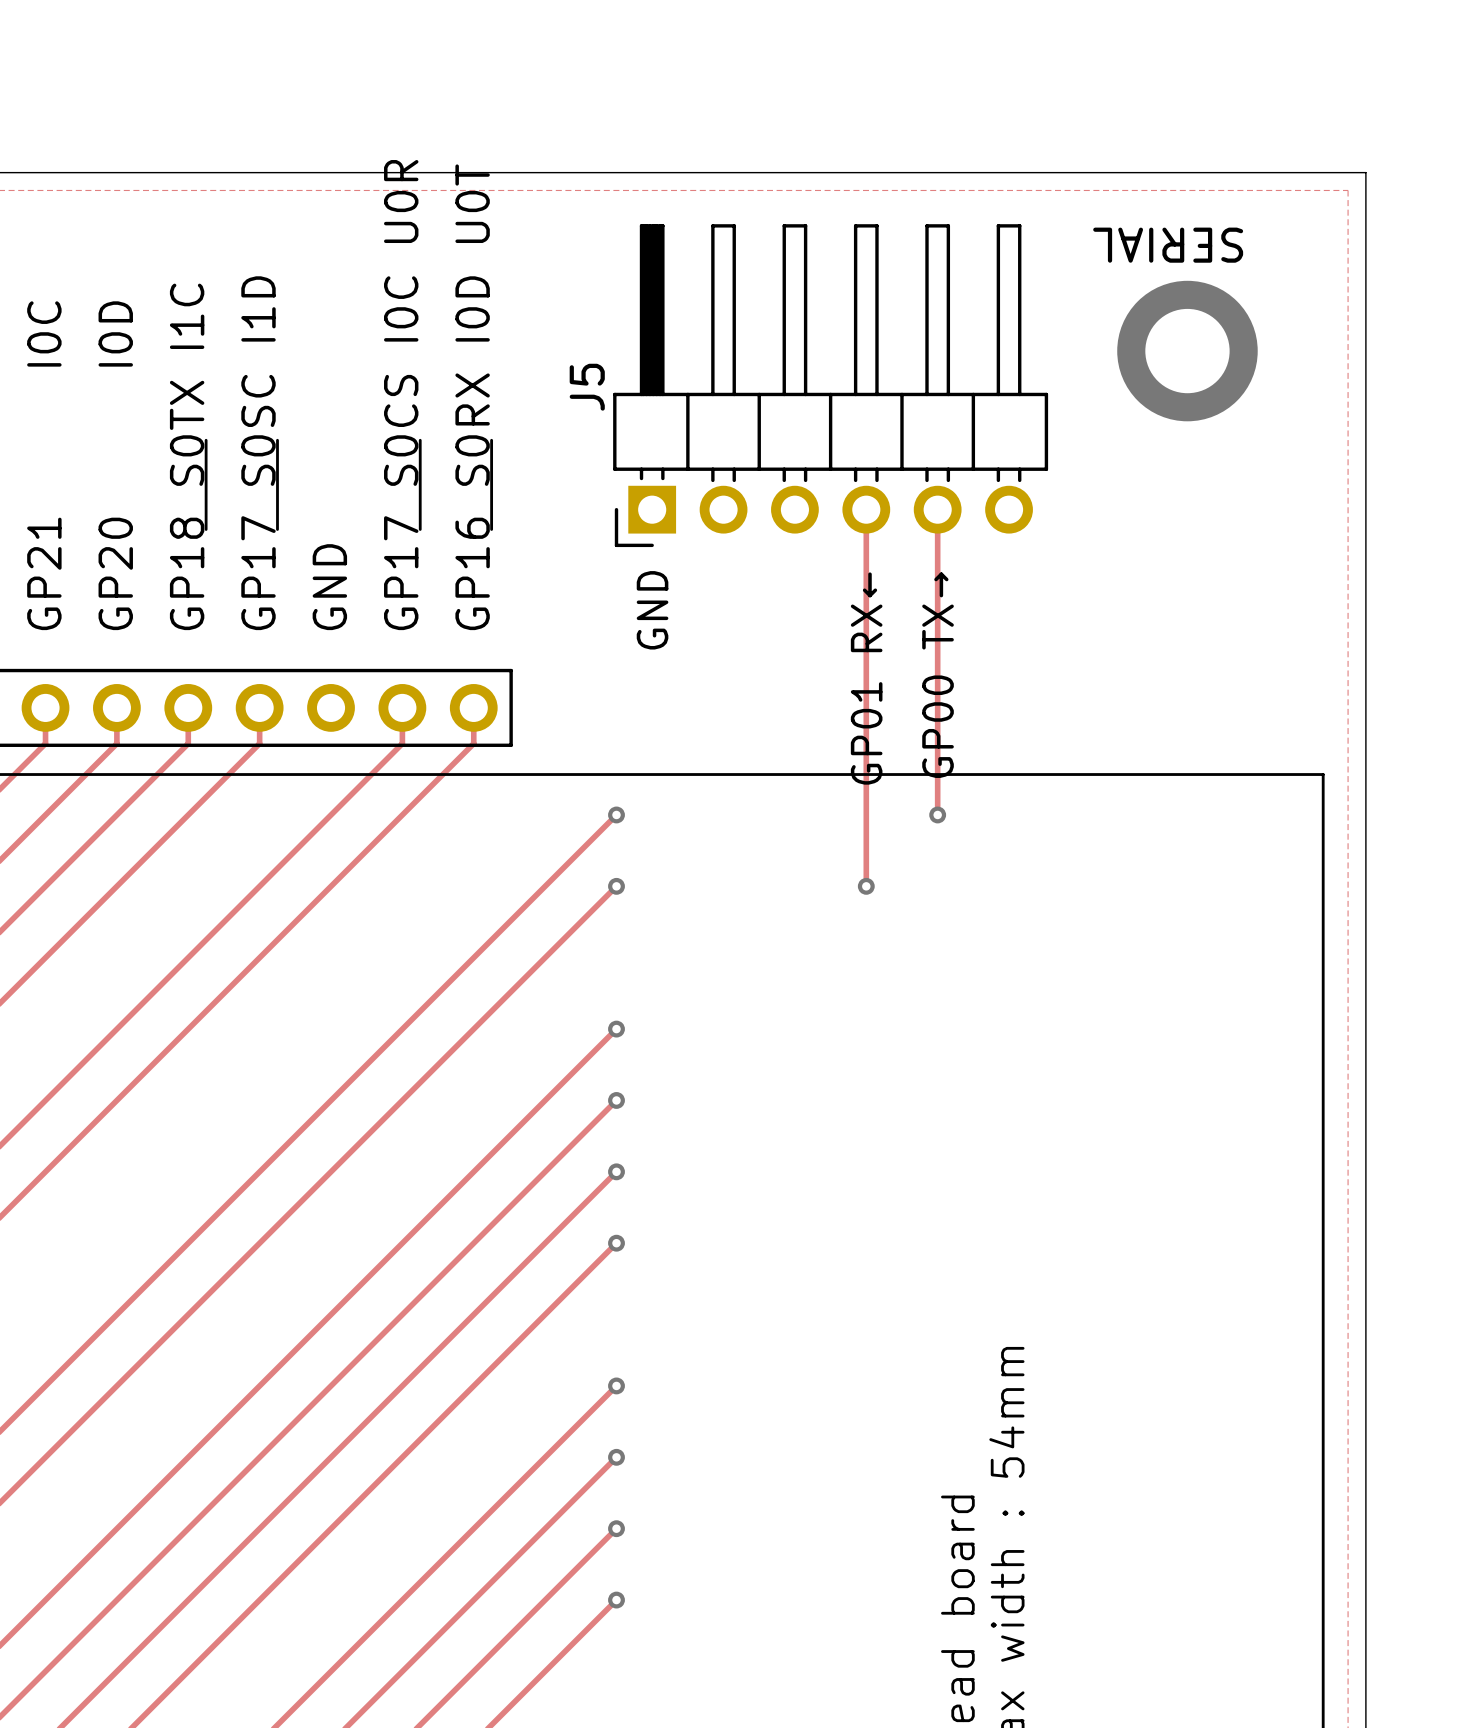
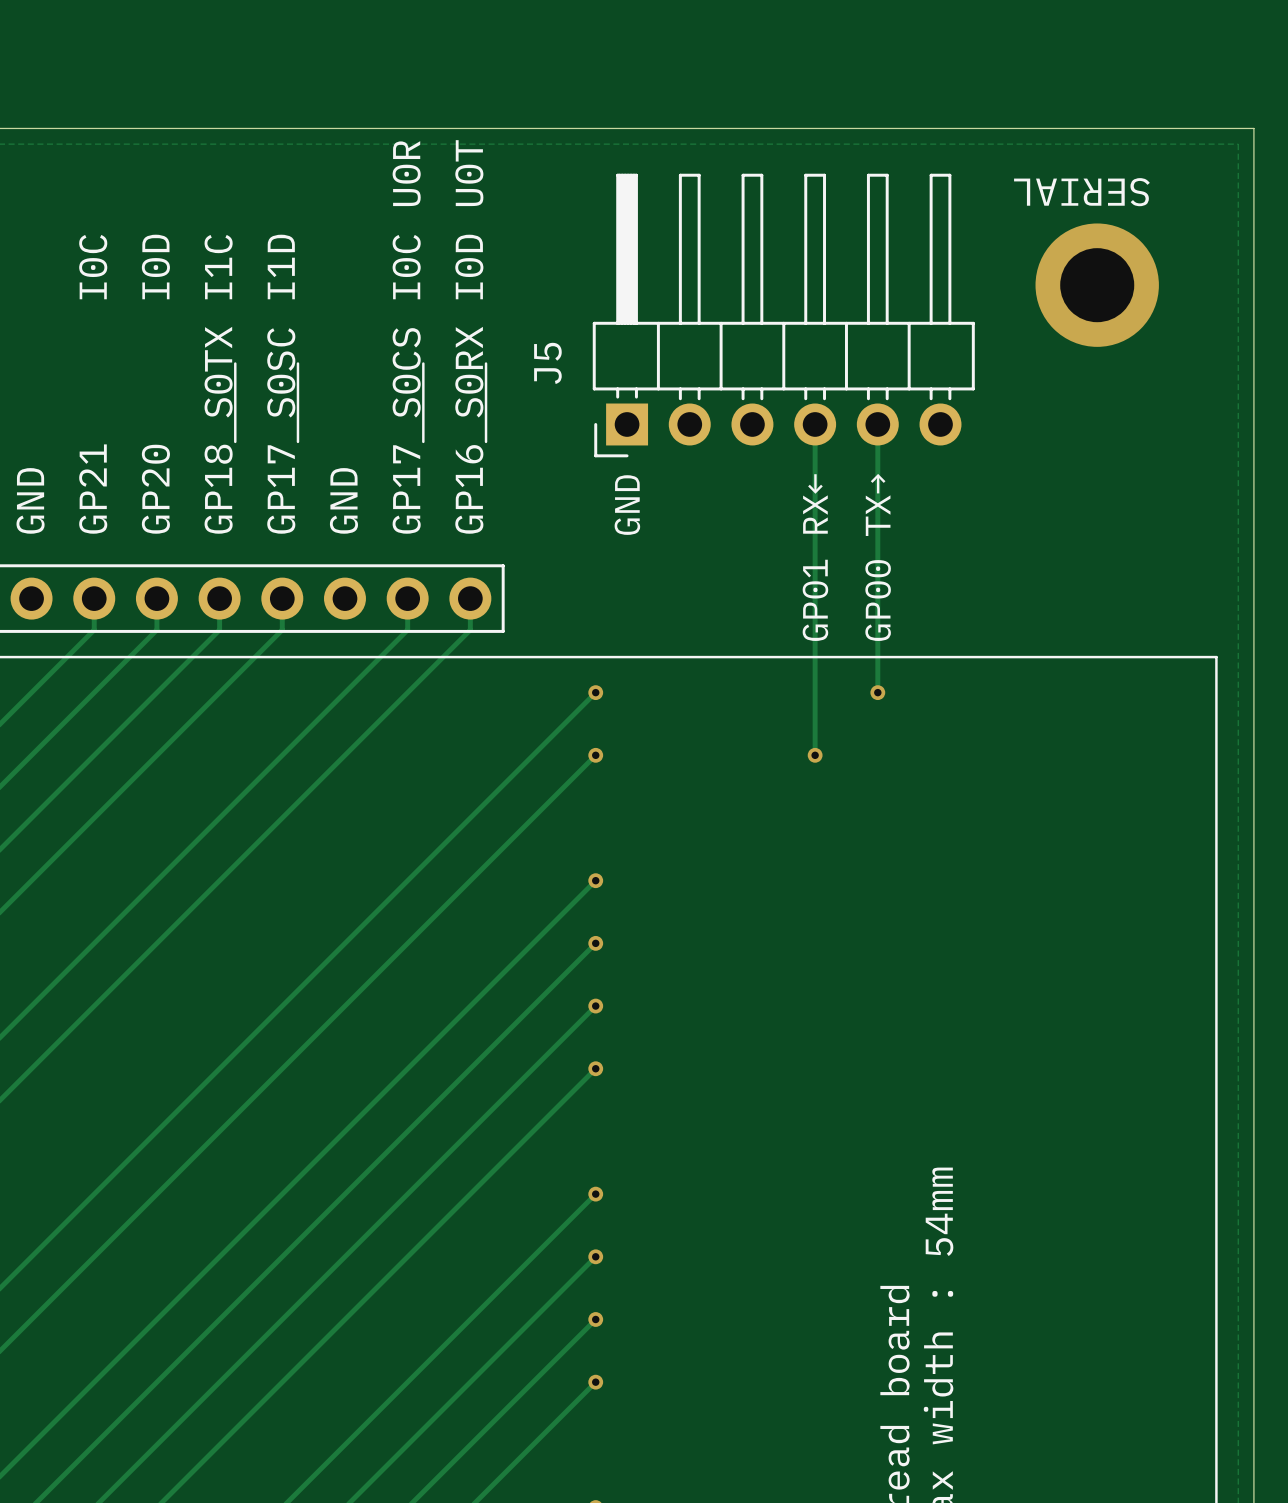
J5 name position: J5 (587, 387) -> J5 (547, 363)

